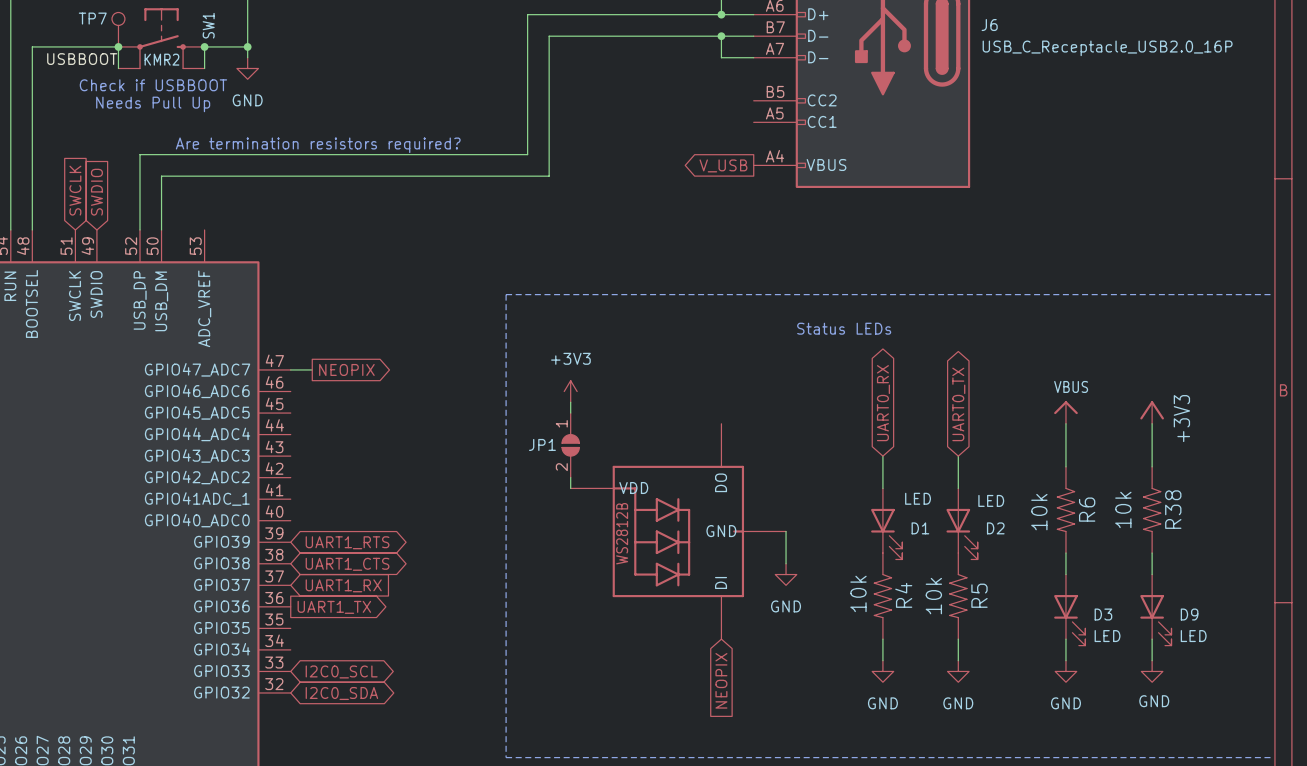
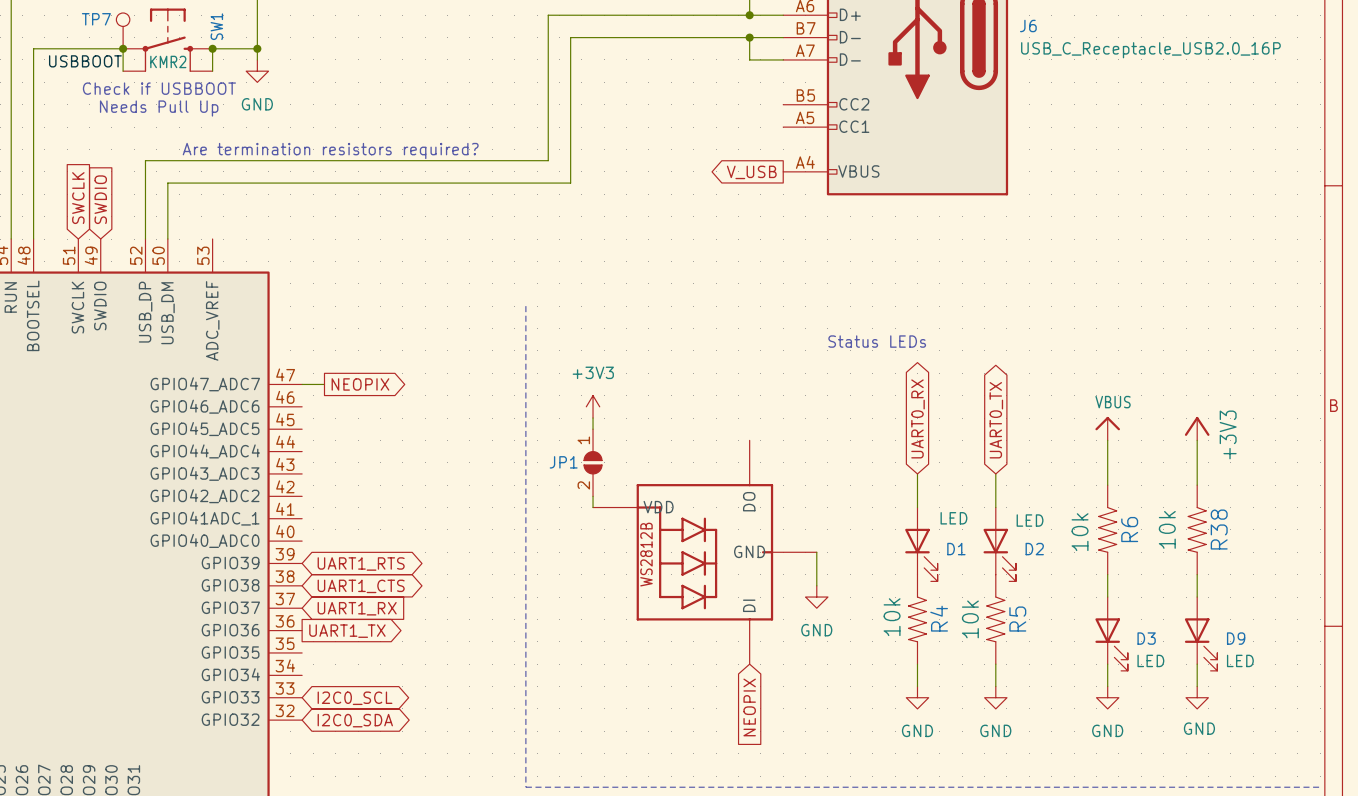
line: (506, 294) (1270, 294) -> none

